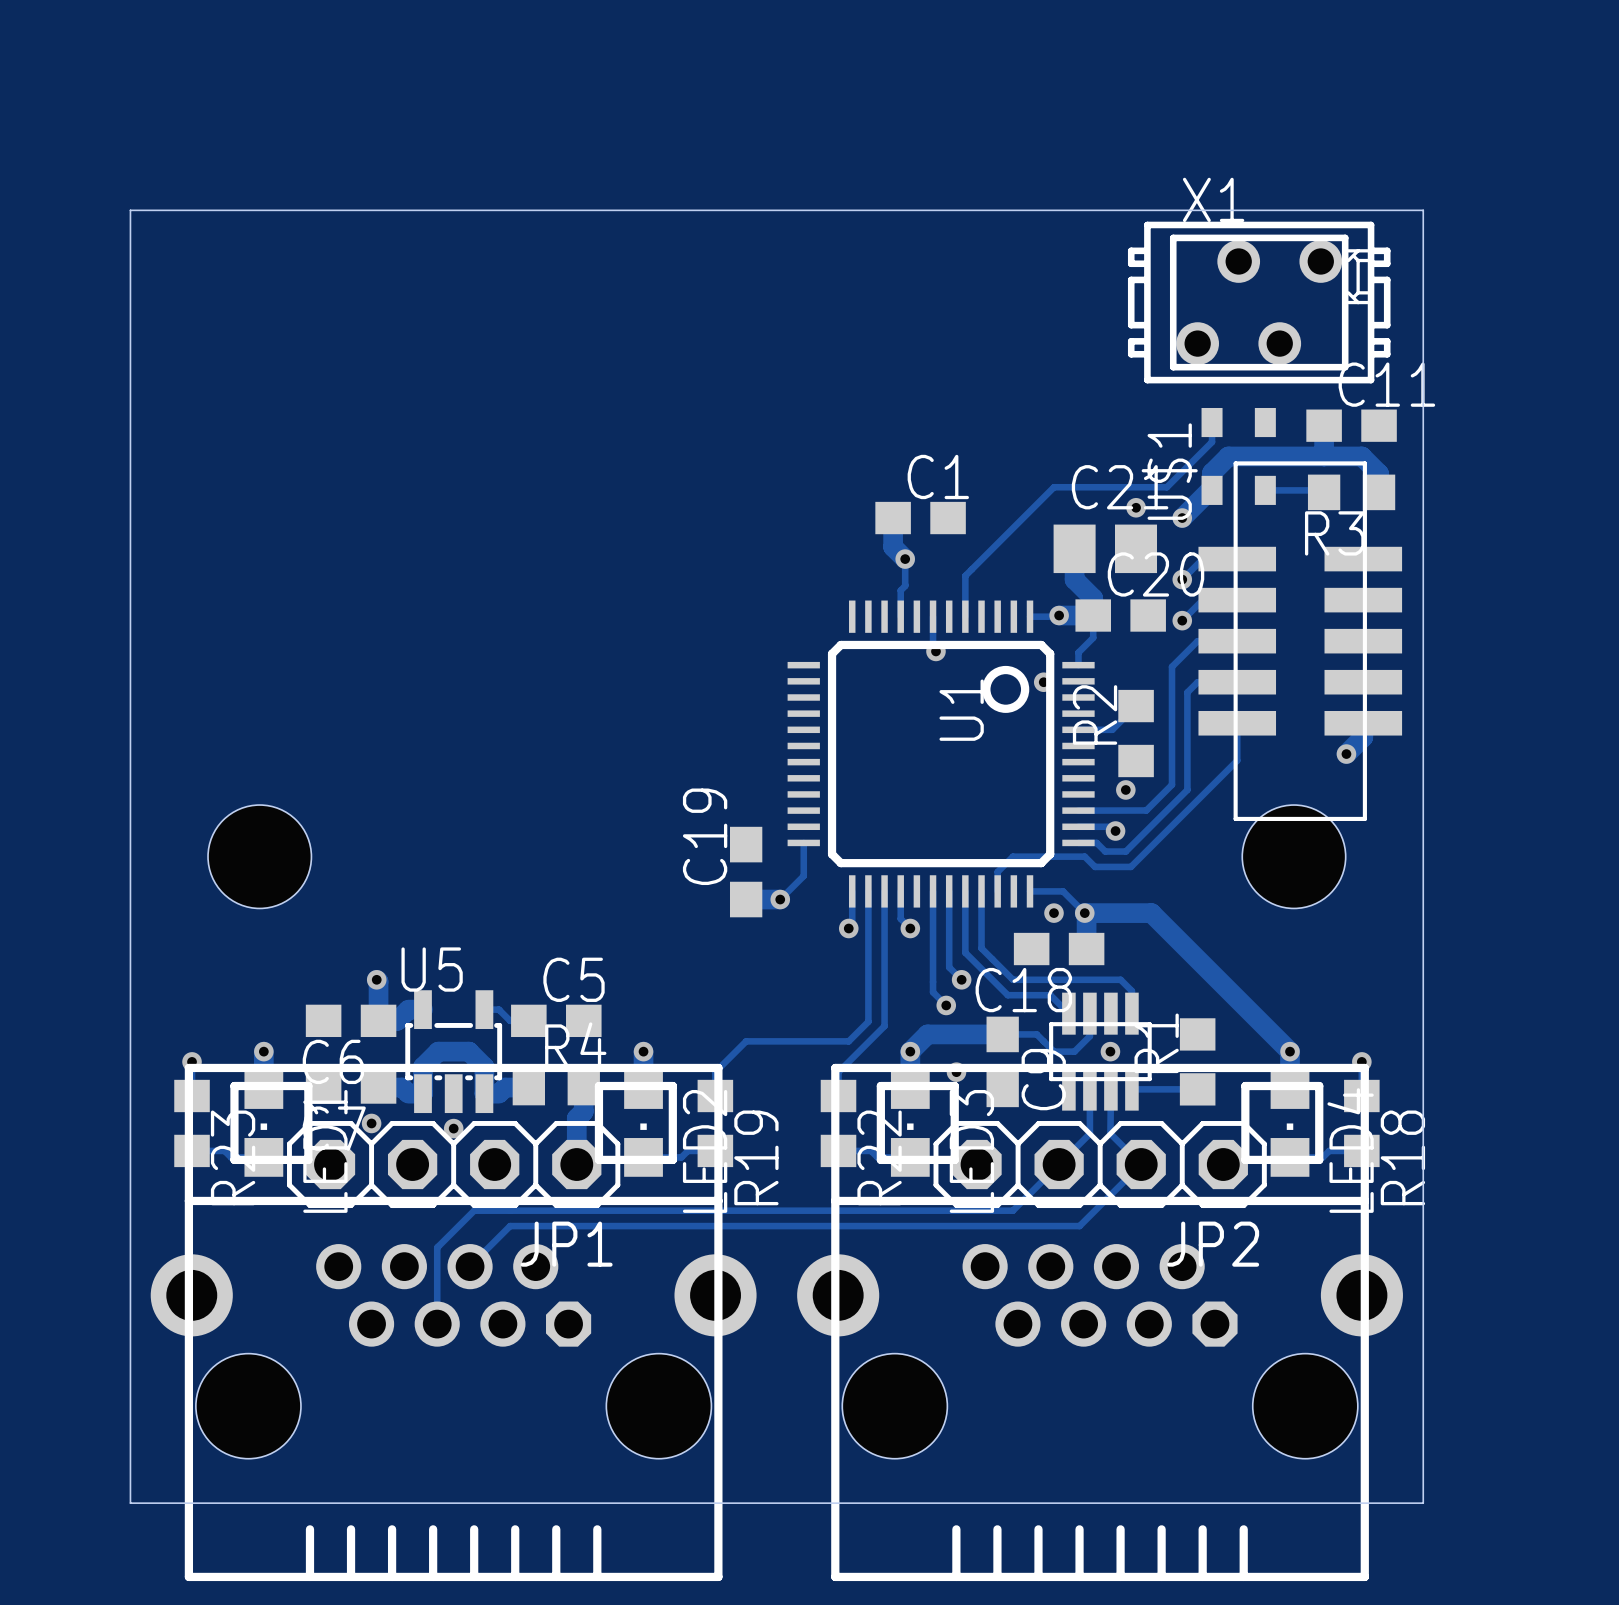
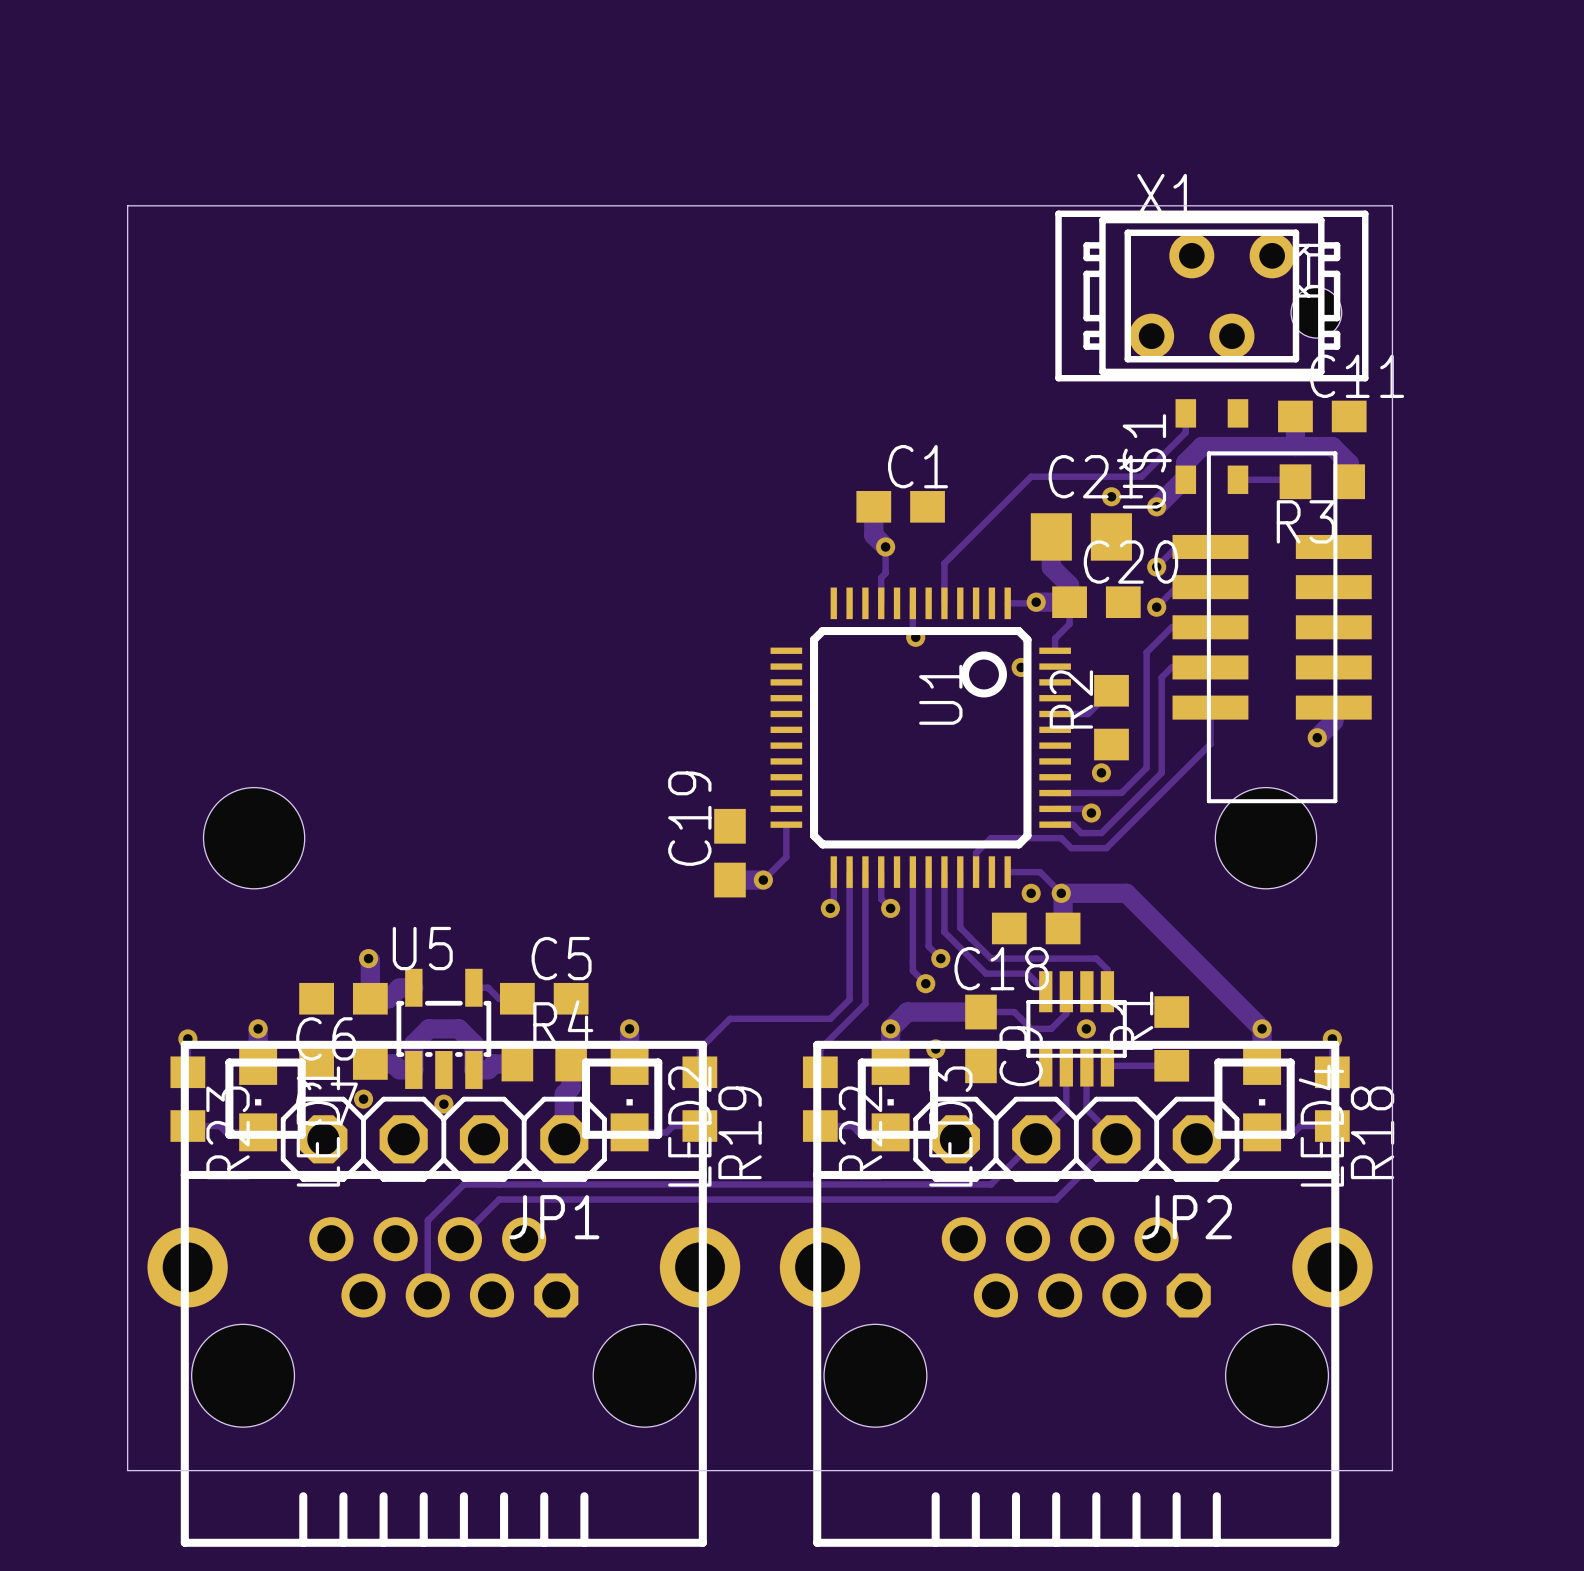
X1 footprint: [1127, 221, 1391, 384] -> [1055, 210, 1369, 382]

